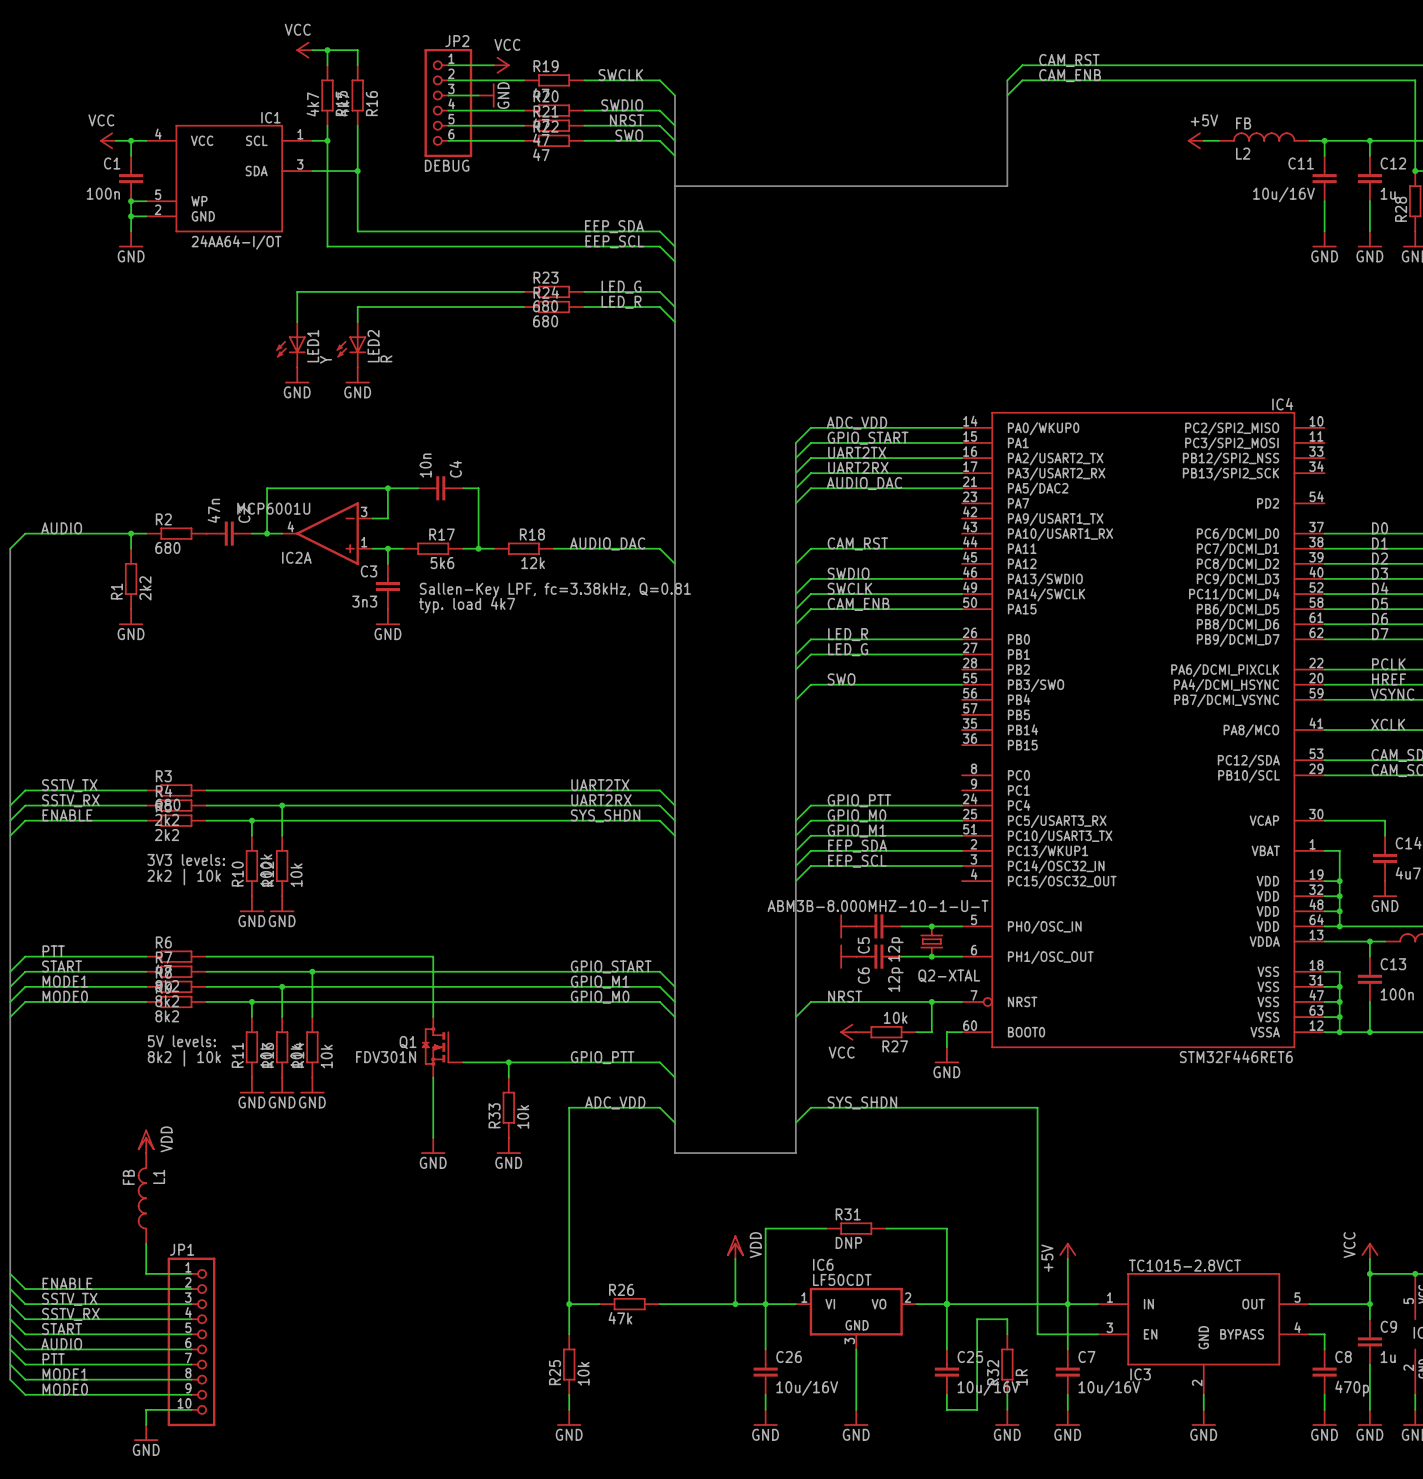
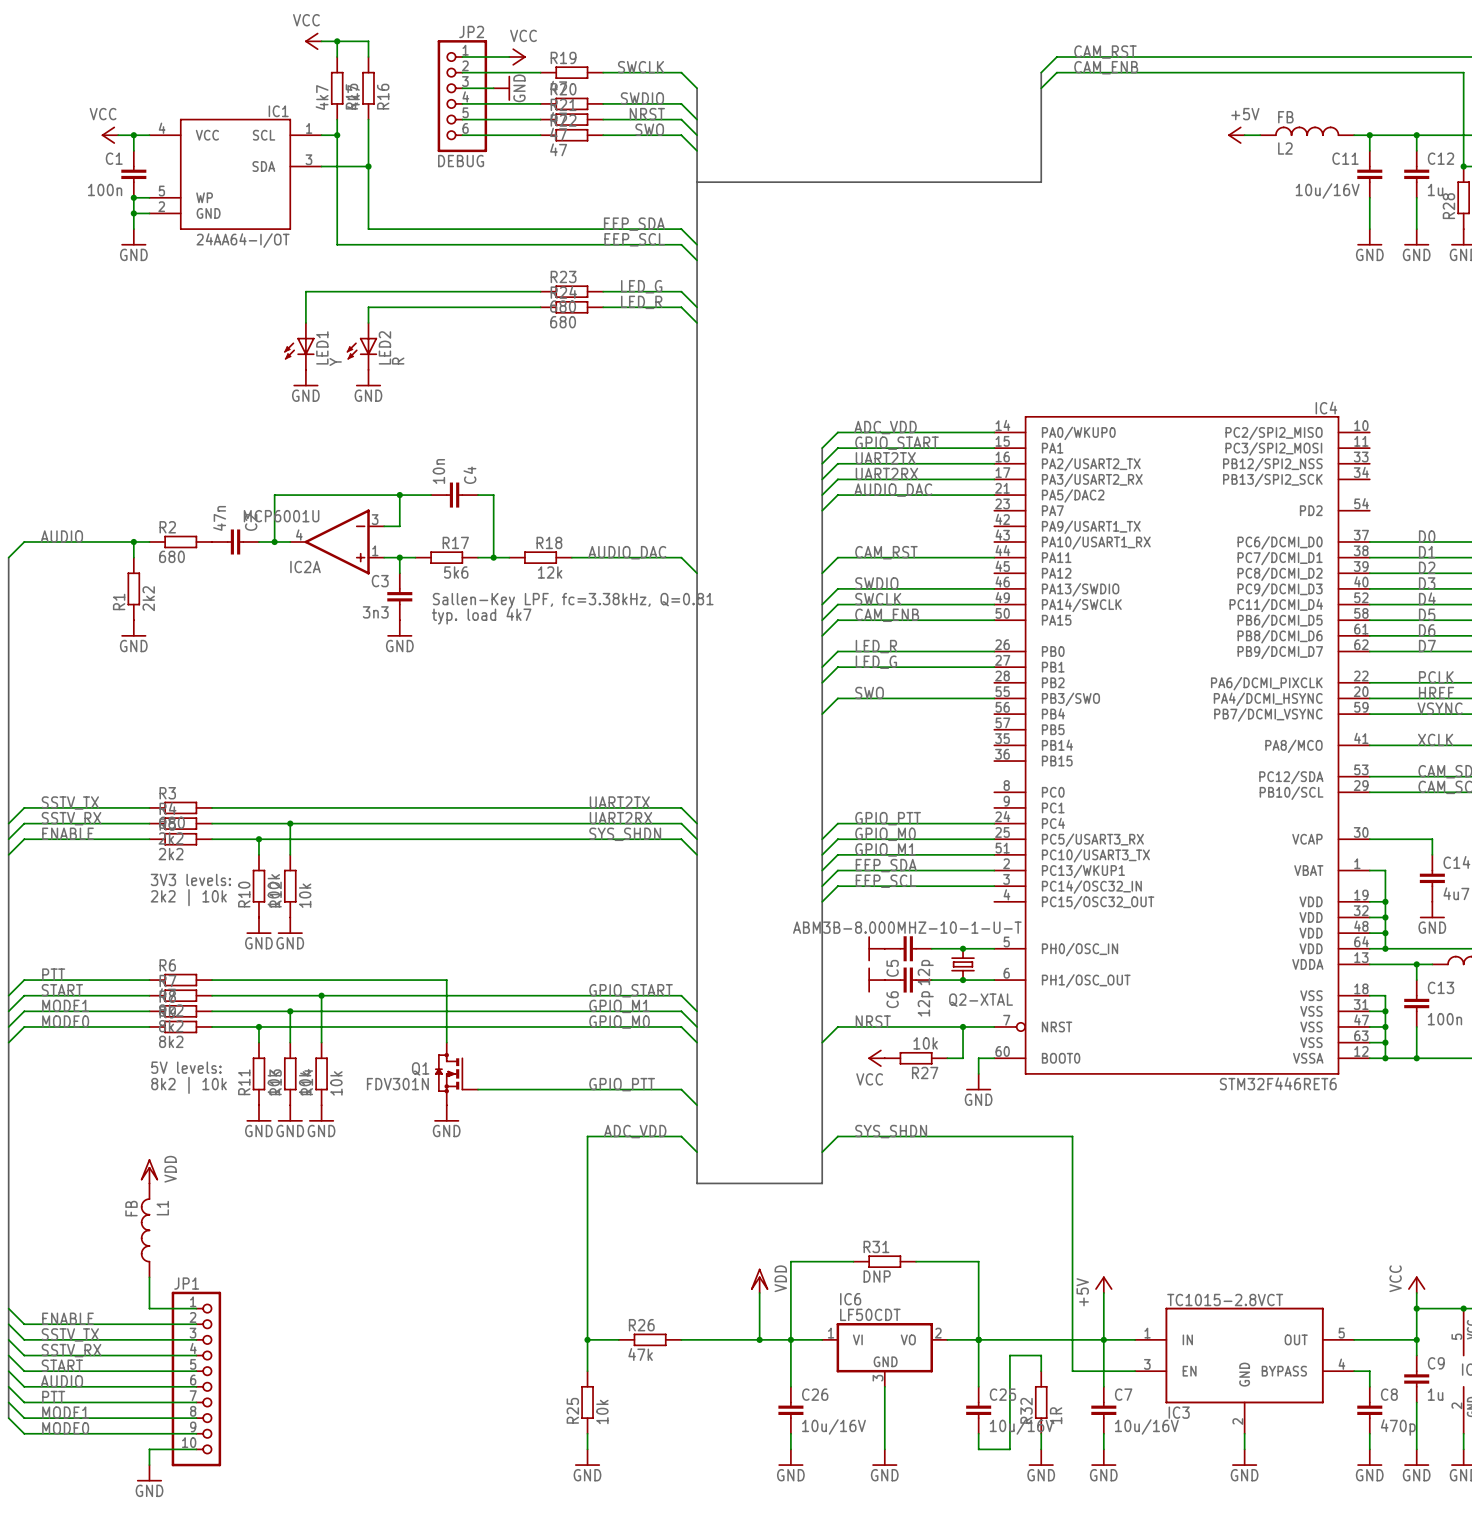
wire: (508, 1062) (508, 1077) -> none
junction: (508, 1062) -> none
wire: (433, 1077) (433, 1137) -> none
power symbol: none -> GND (446, 1113)
R33: 10k (508, 1107) -> none
power symbol: GND (433, 1145) -> none
power symbol: GND (508, 1145) -> none

